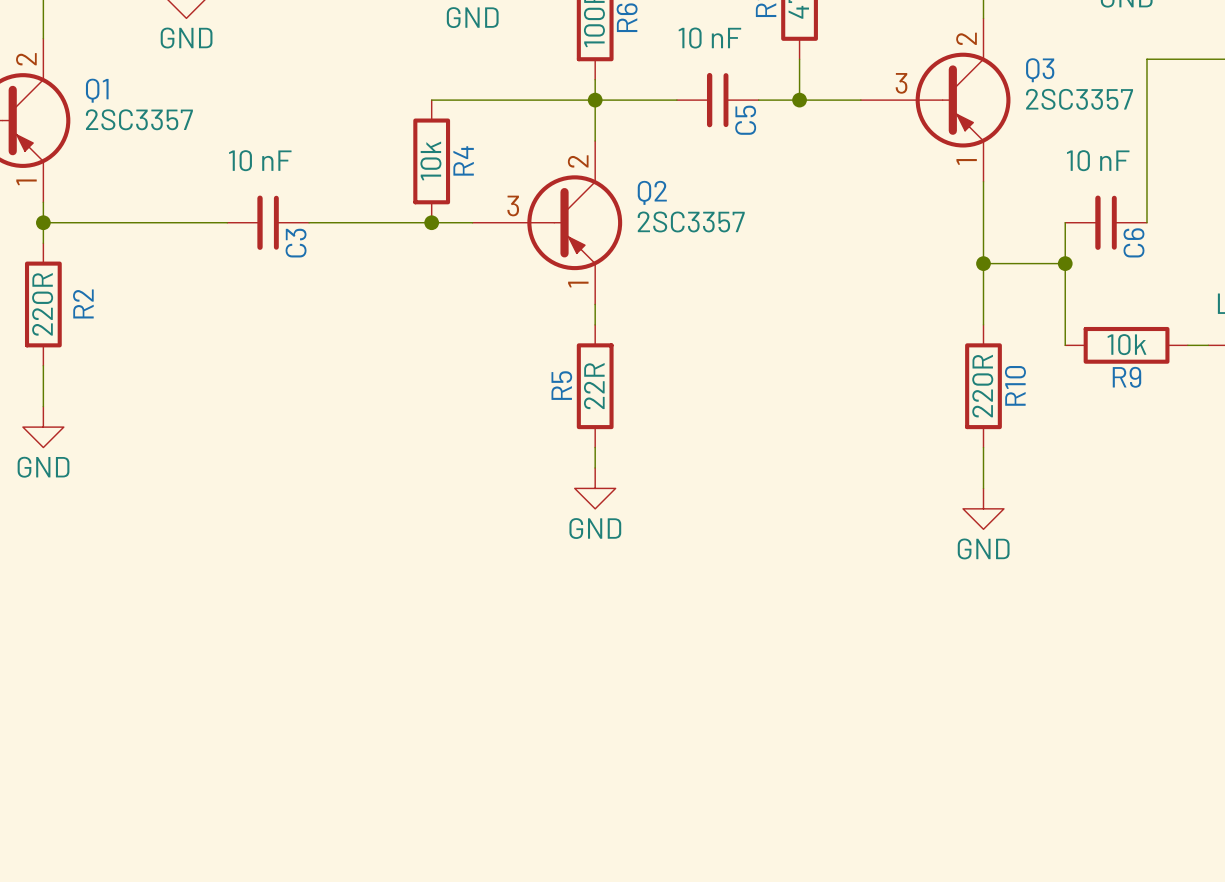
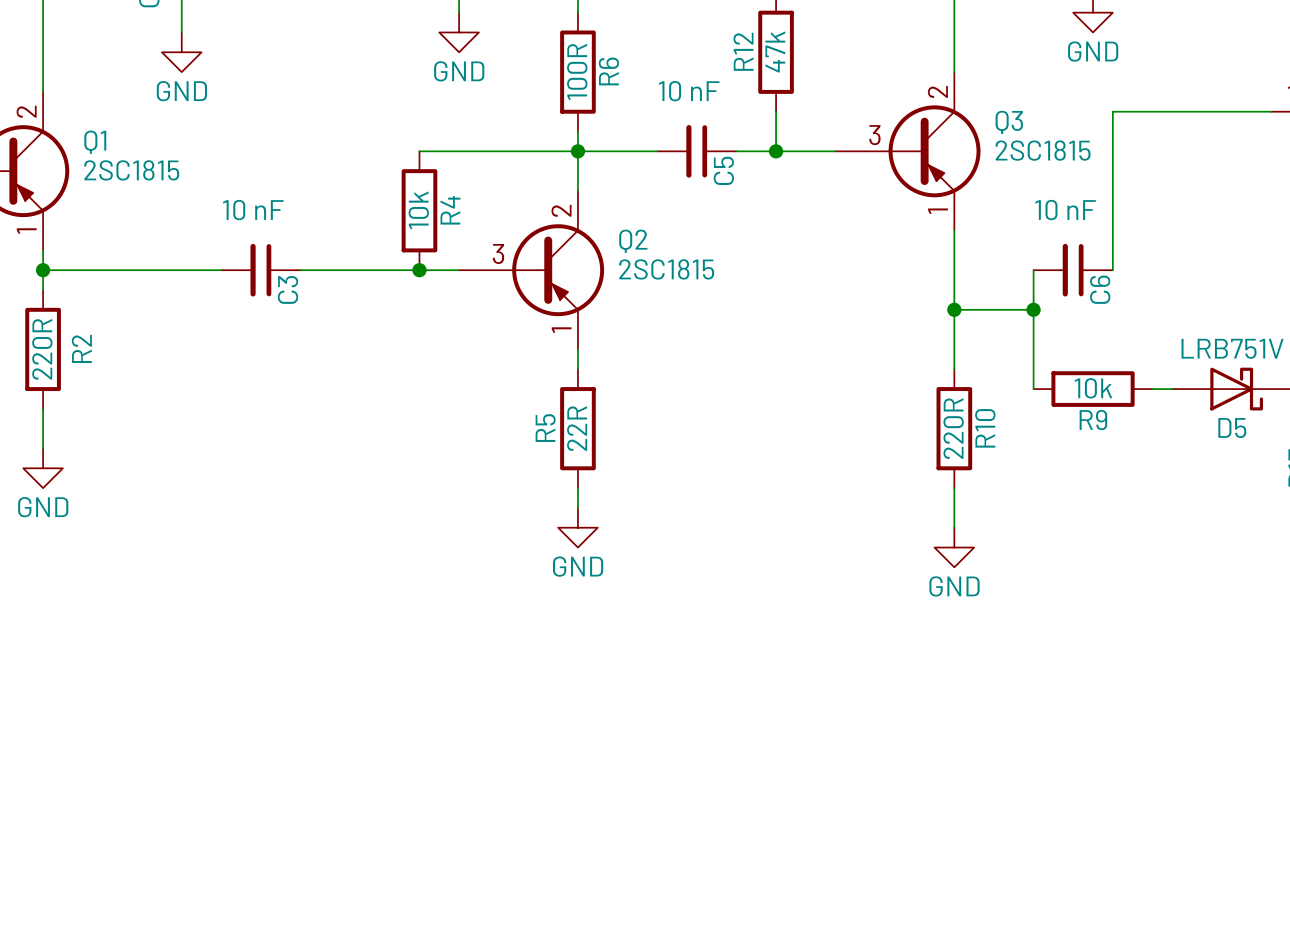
Q3 value: 2SC3357 (1079, 99) -> 2SC1815 (1043, 150)
Q1 value: 2SC3357 (139, 119) -> 2SC1815 (131, 170)
Q2 value: 2SC3357 (691, 221) -> 2SC1815 (666, 269)

